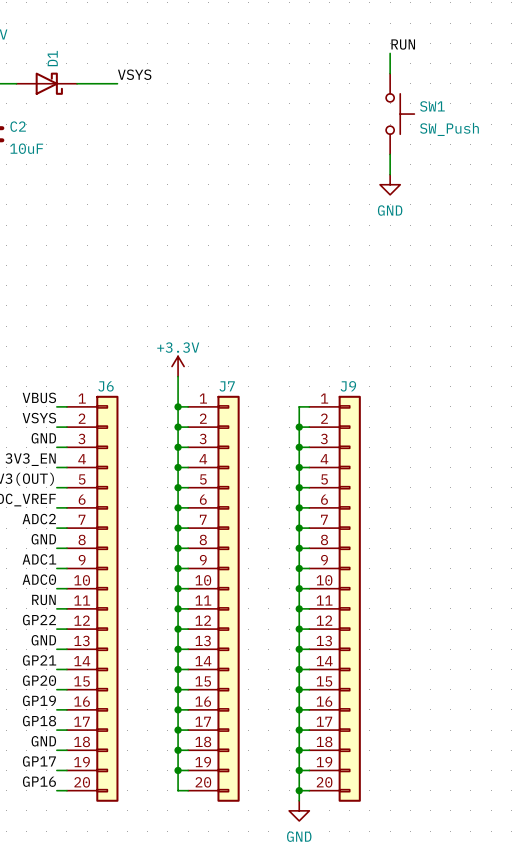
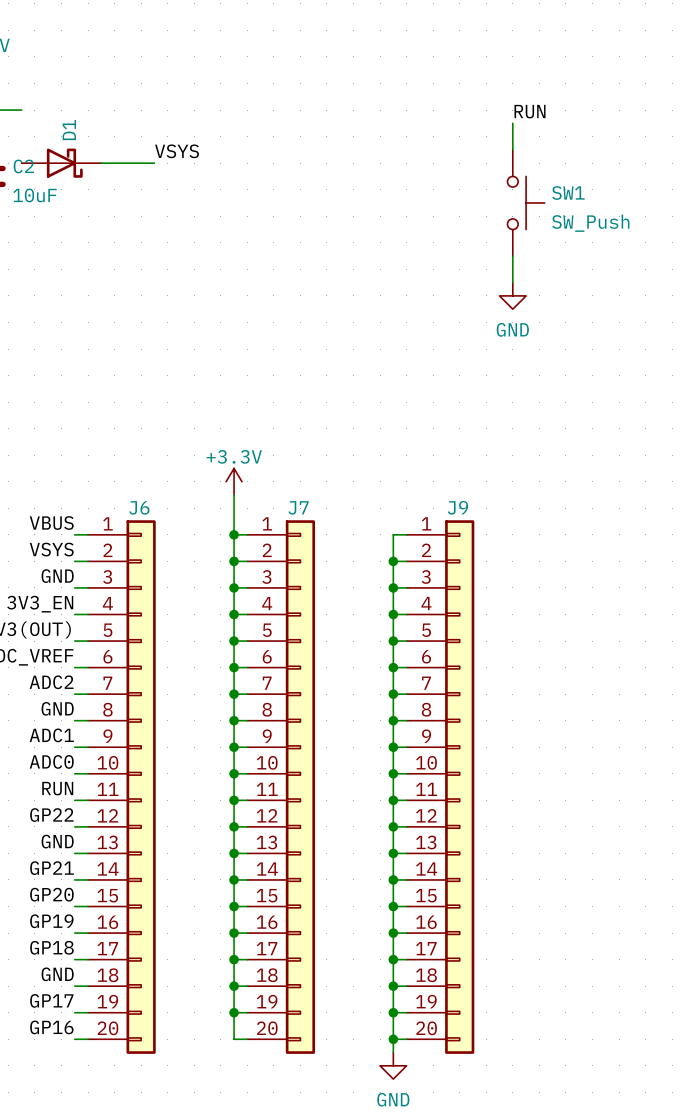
label position: RUN (403, 44) -> RUN (530, 111)
wire: (390, 53) (390, 73) -> (512, 123) (512, 149)
label position: VSYS (134, 74) -> VSYS (177, 151)
D1 position: (46, 83) -> (61, 163)
wire: (77, 83) (117, 83) -> (101, 163) (154, 163)
SW1 position: (400, 114) -> (526, 202)
wire: (390, 154) (390, 174) -> (512, 256) (512, 282)
power symbol position: GND (390, 184) -> GND (512, 295)

